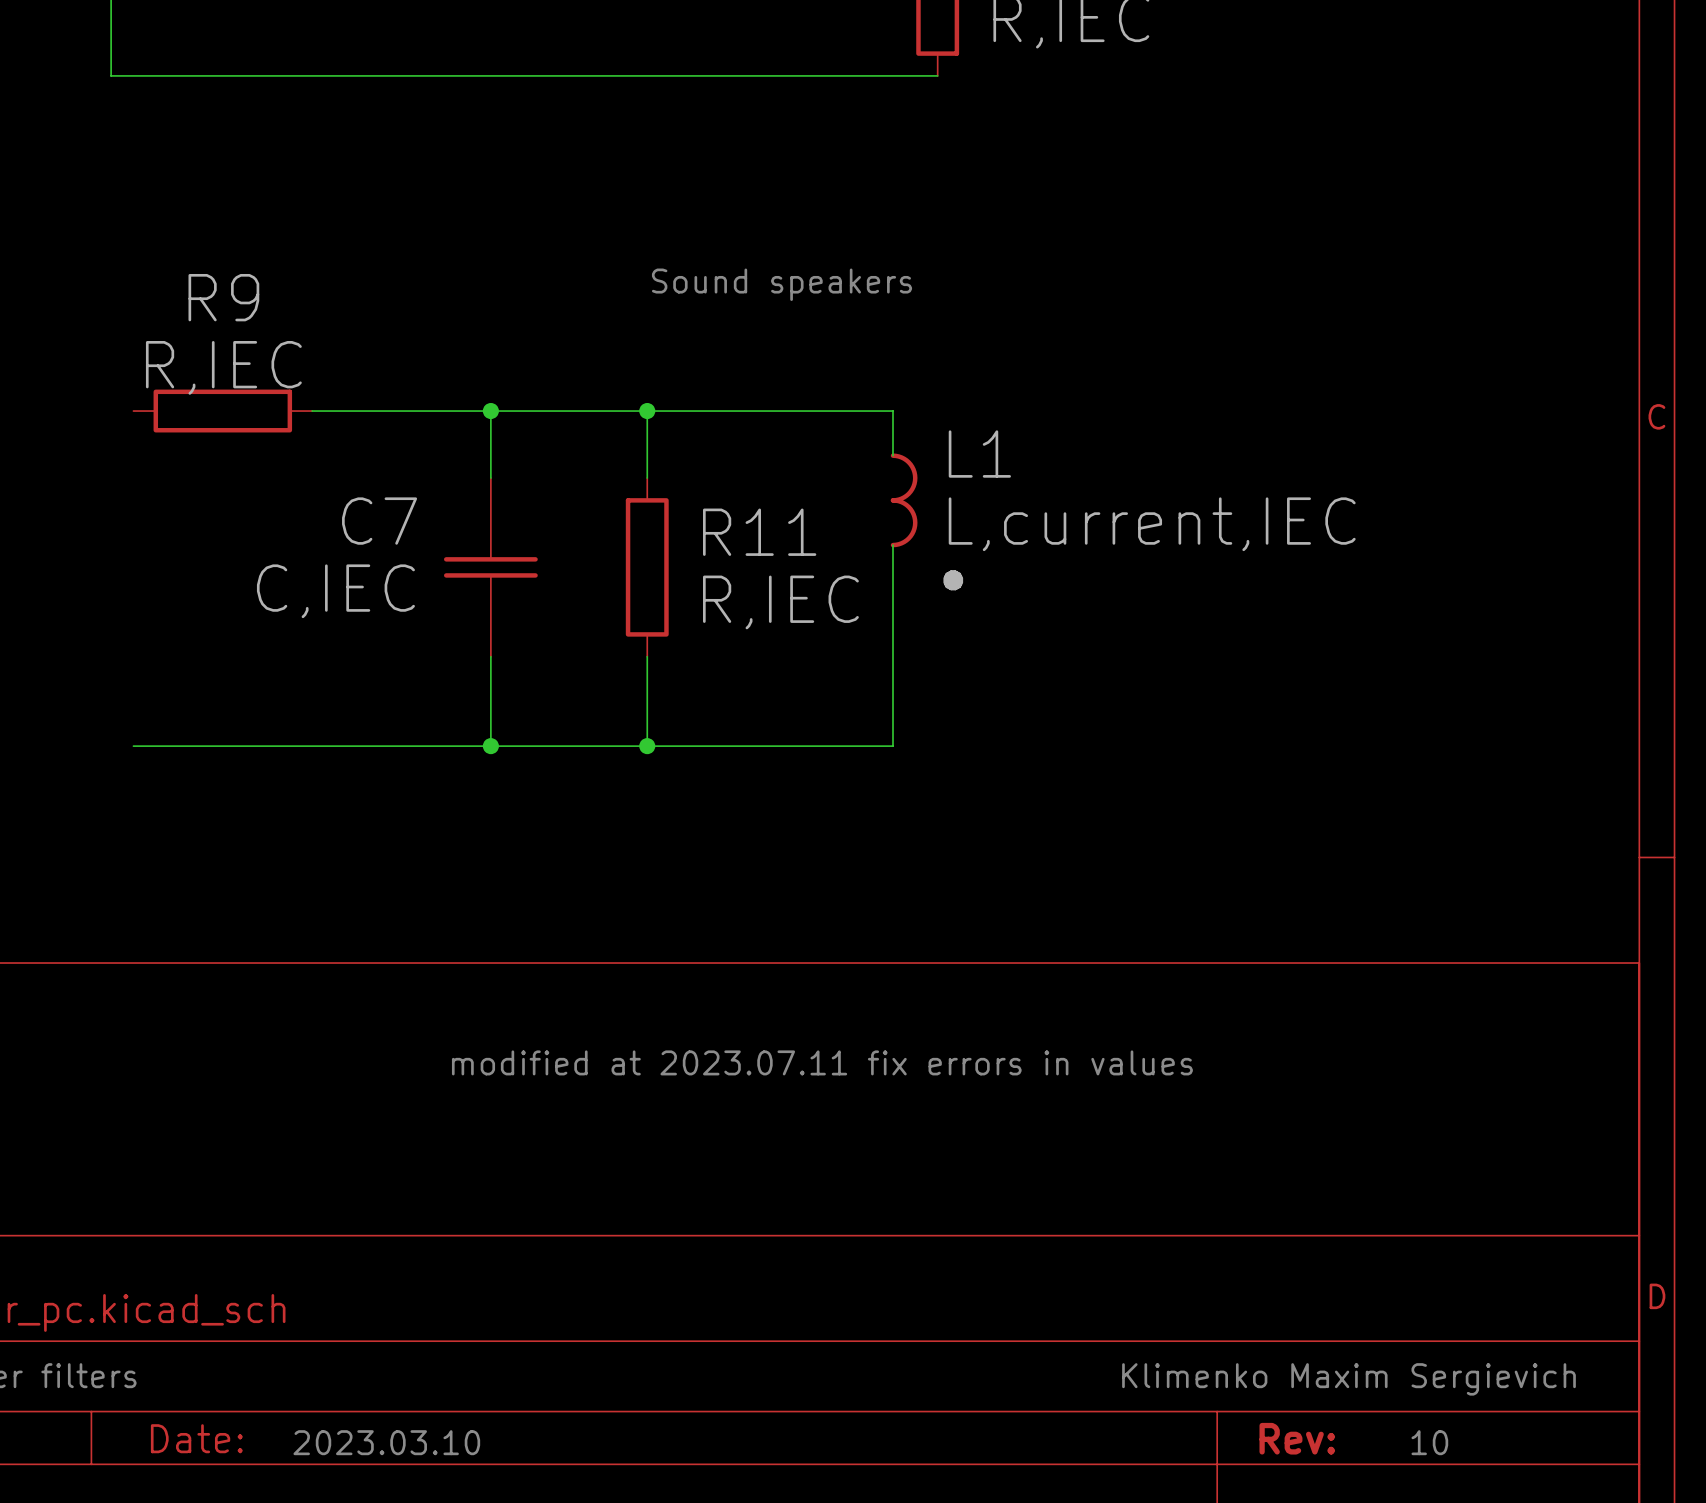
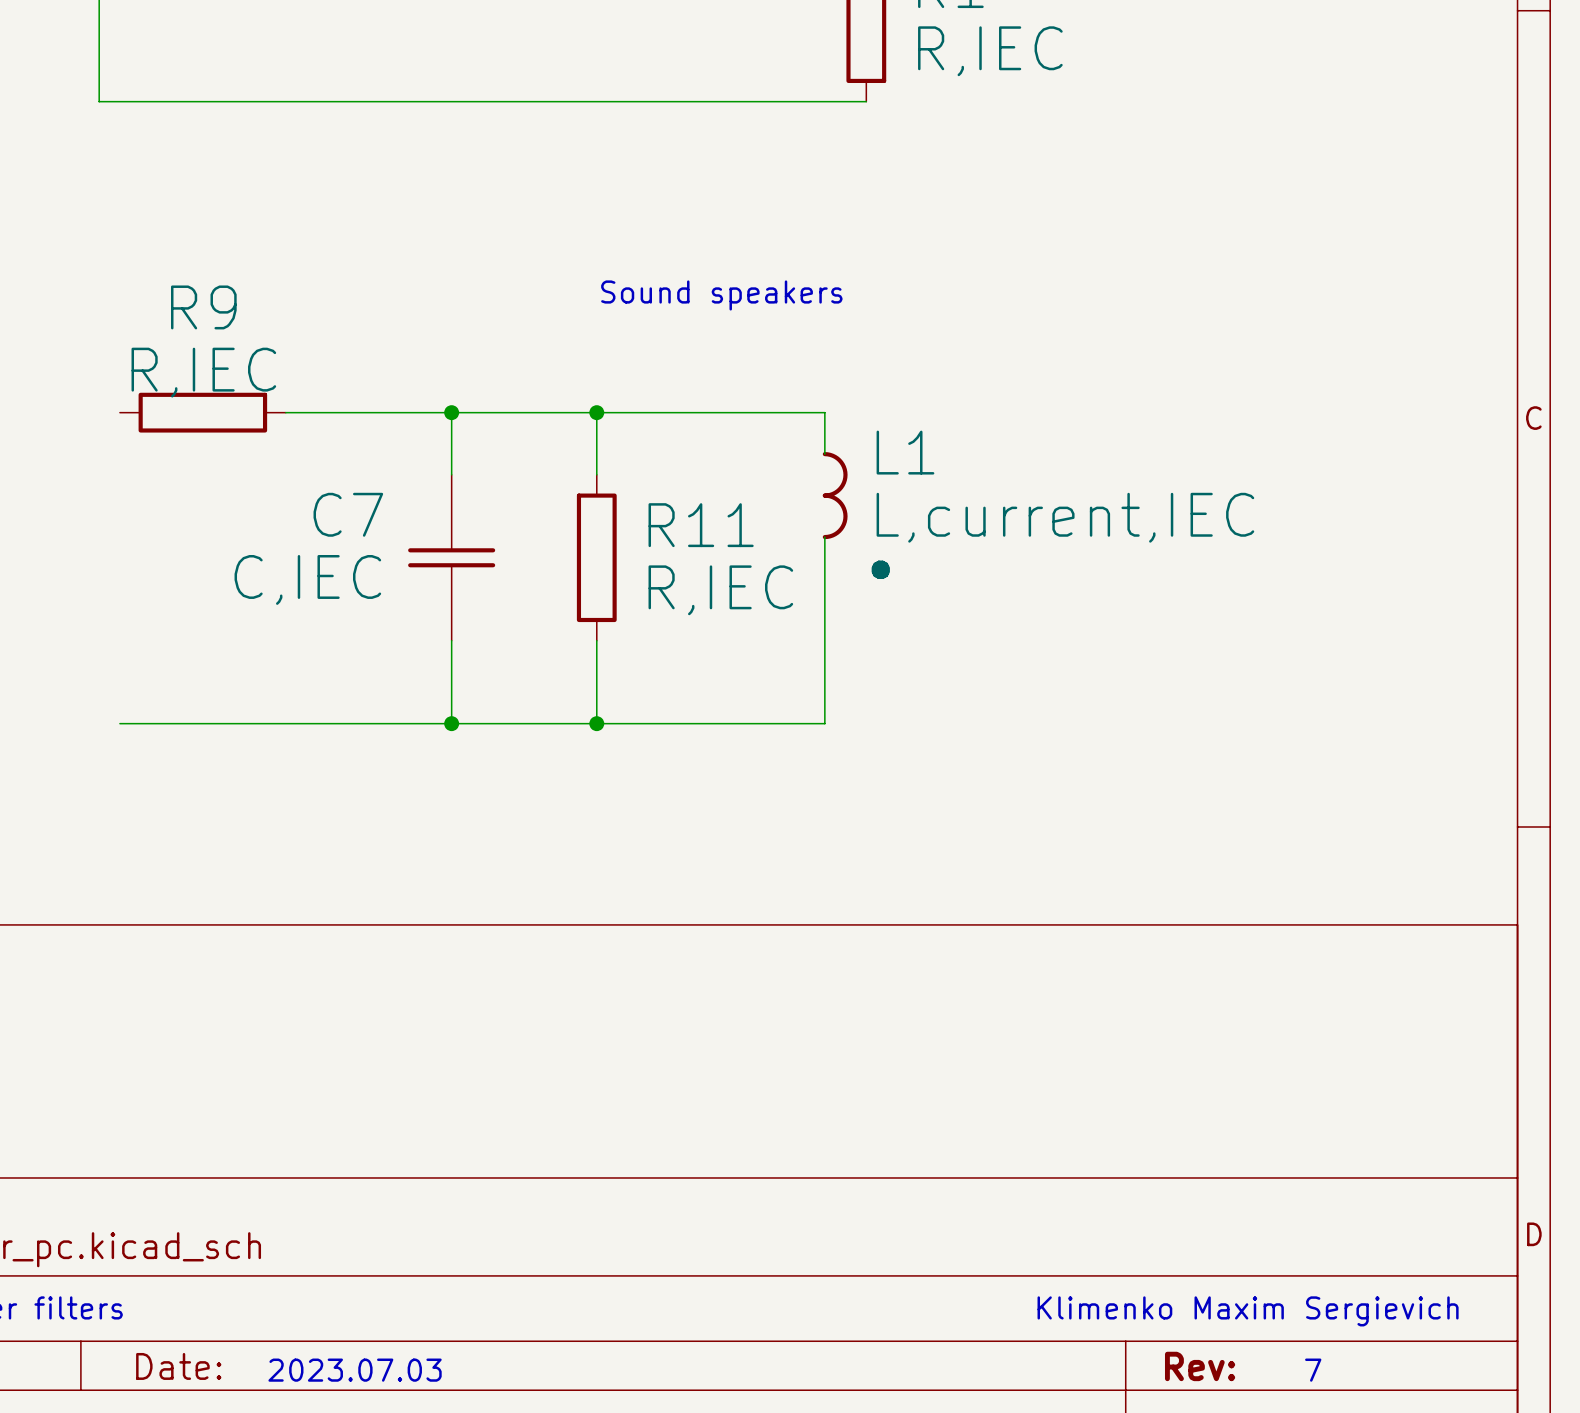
text: modified at 2023.07.11 fix errors in values (822, 1062) -> none
text: 2023.03.10 (386, 1442) -> 2023.07.03 (355, 1370)
text: 10 (1429, 1442) -> 7 (1313, 1370)

